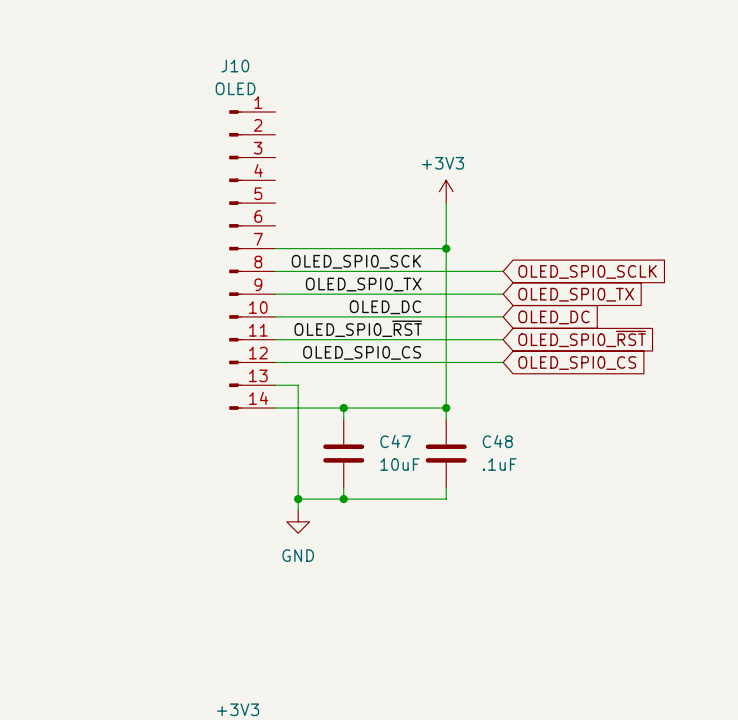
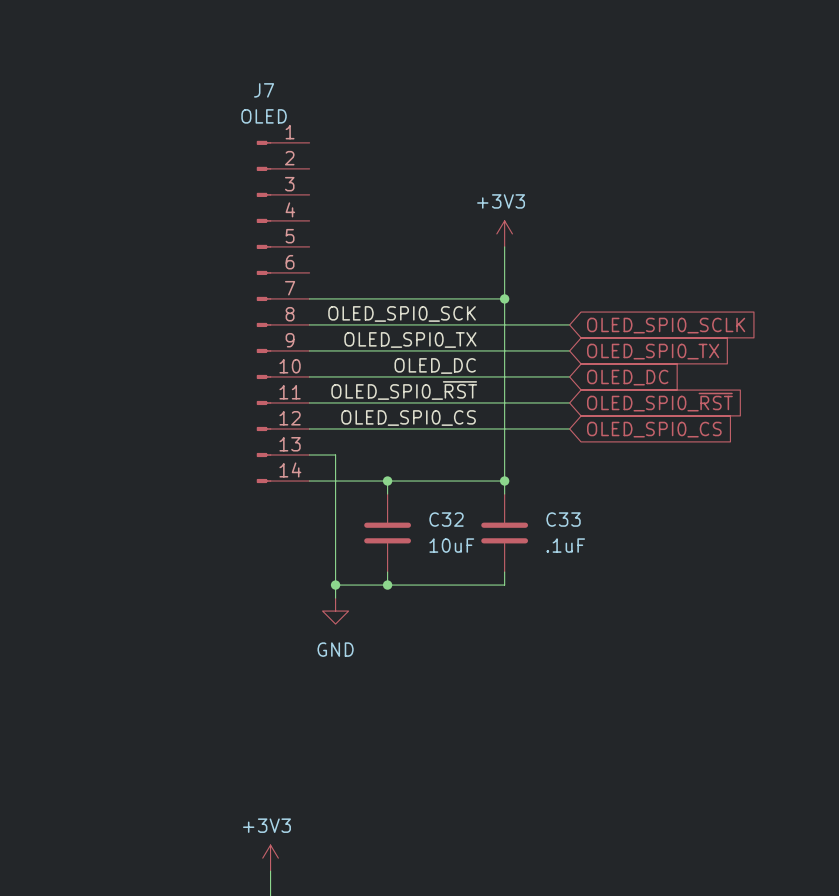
J10 name: J10 (235, 66) -> J7 (264, 90)
C47 name: C47 (395, 441) -> C32 (446, 519)
C48 name: C48 (497, 441) -> C33 (563, 519)

